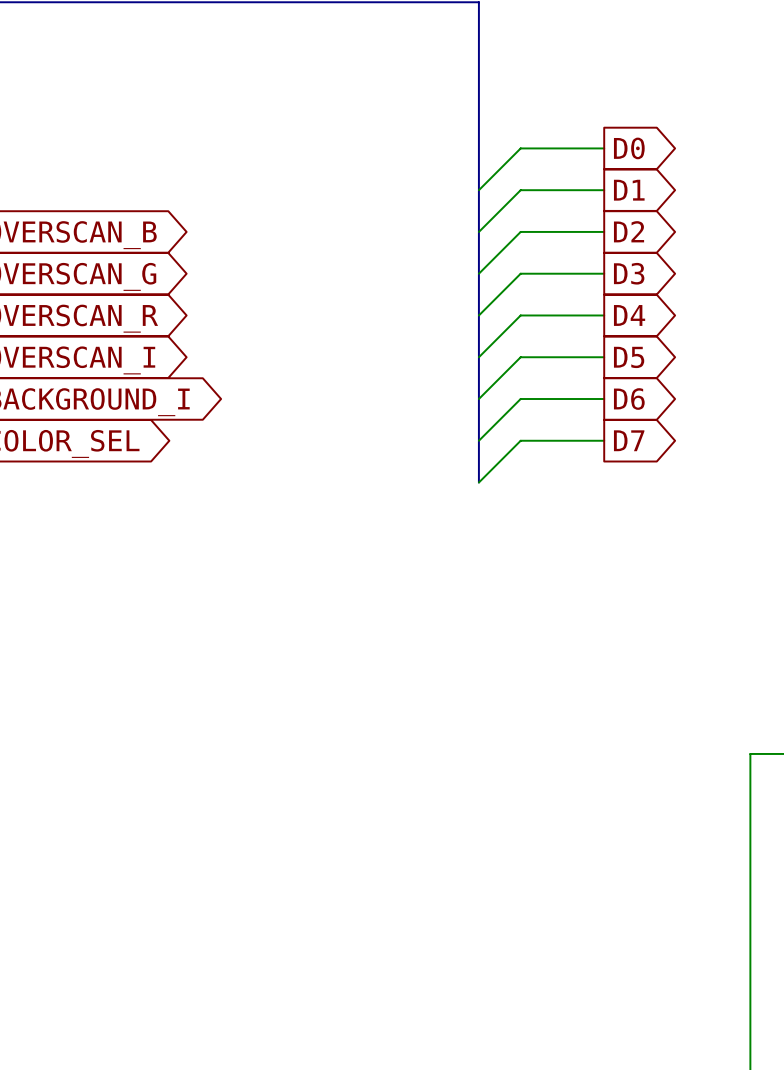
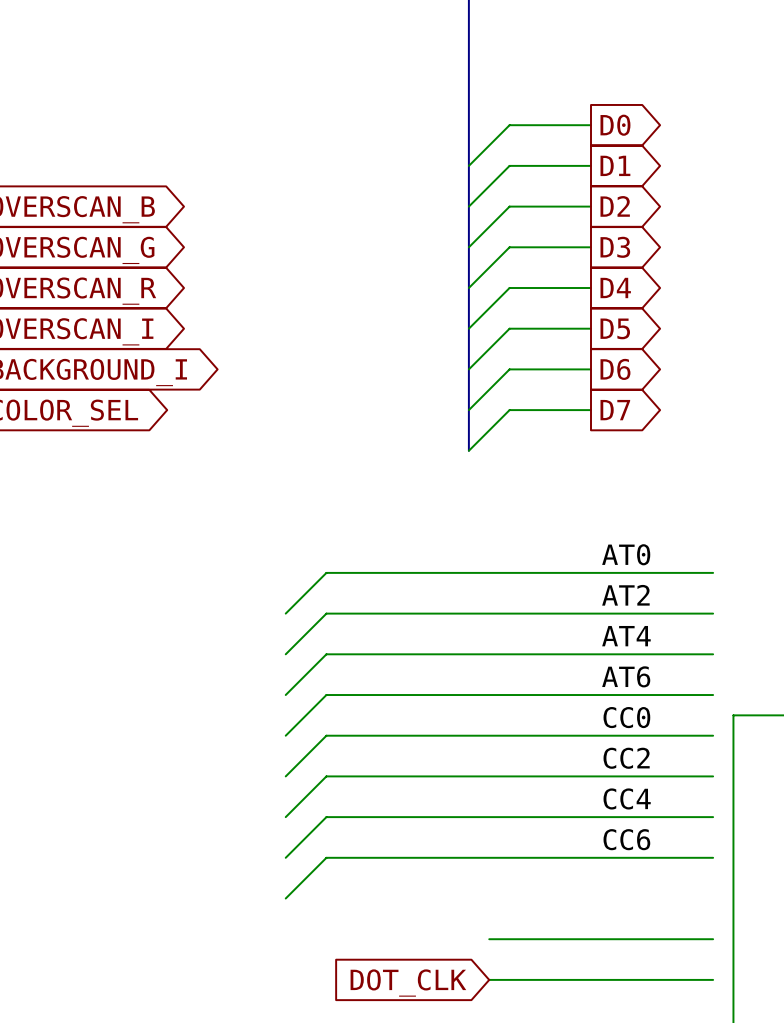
label: none -> AT0 (626, 554)
wire: none -> (713, 572) (326, 572) (285, 613)
label: none -> AT2 (625, 595)
wire: none -> (713, 613) (326, 613) (285, 654)
label: none -> AT4 (626, 636)
wire: none -> (713, 654) (326, 654) (285, 695)
label: none -> AT6 (626, 676)
wire: none -> (713, 695) (326, 695) (285, 735)
label: none -> CC0 (626, 717)
wire: none -> (713, 735) (326, 735) (285, 776)
label: none -> CC2 (626, 758)
wire: none -> (713, 776) (326, 776) (285, 817)
label: none -> CC4 (627, 798)
wire: none -> (713, 817) (326, 817) (285, 857)
label: none -> CC6 (626, 839)
wire: none -> (713, 857) (326, 857) (285, 898)
wire: none -> (489, 939) (713, 939)
wire: none -> (489, 979) (713, 979)
global label: none -> DOT_CLK (408, 983)

